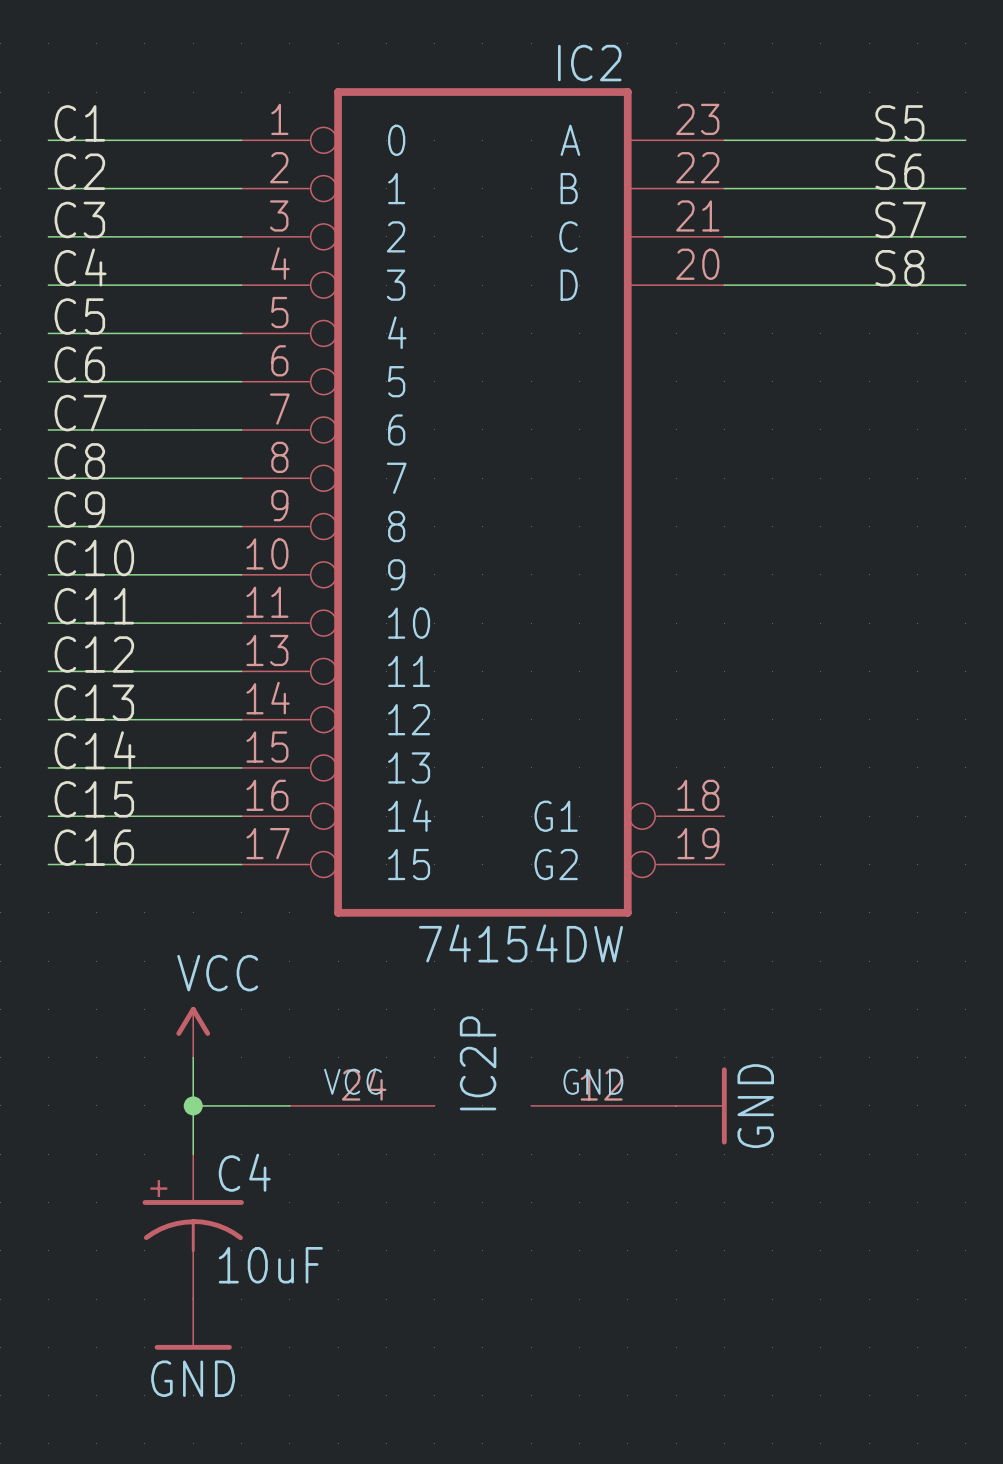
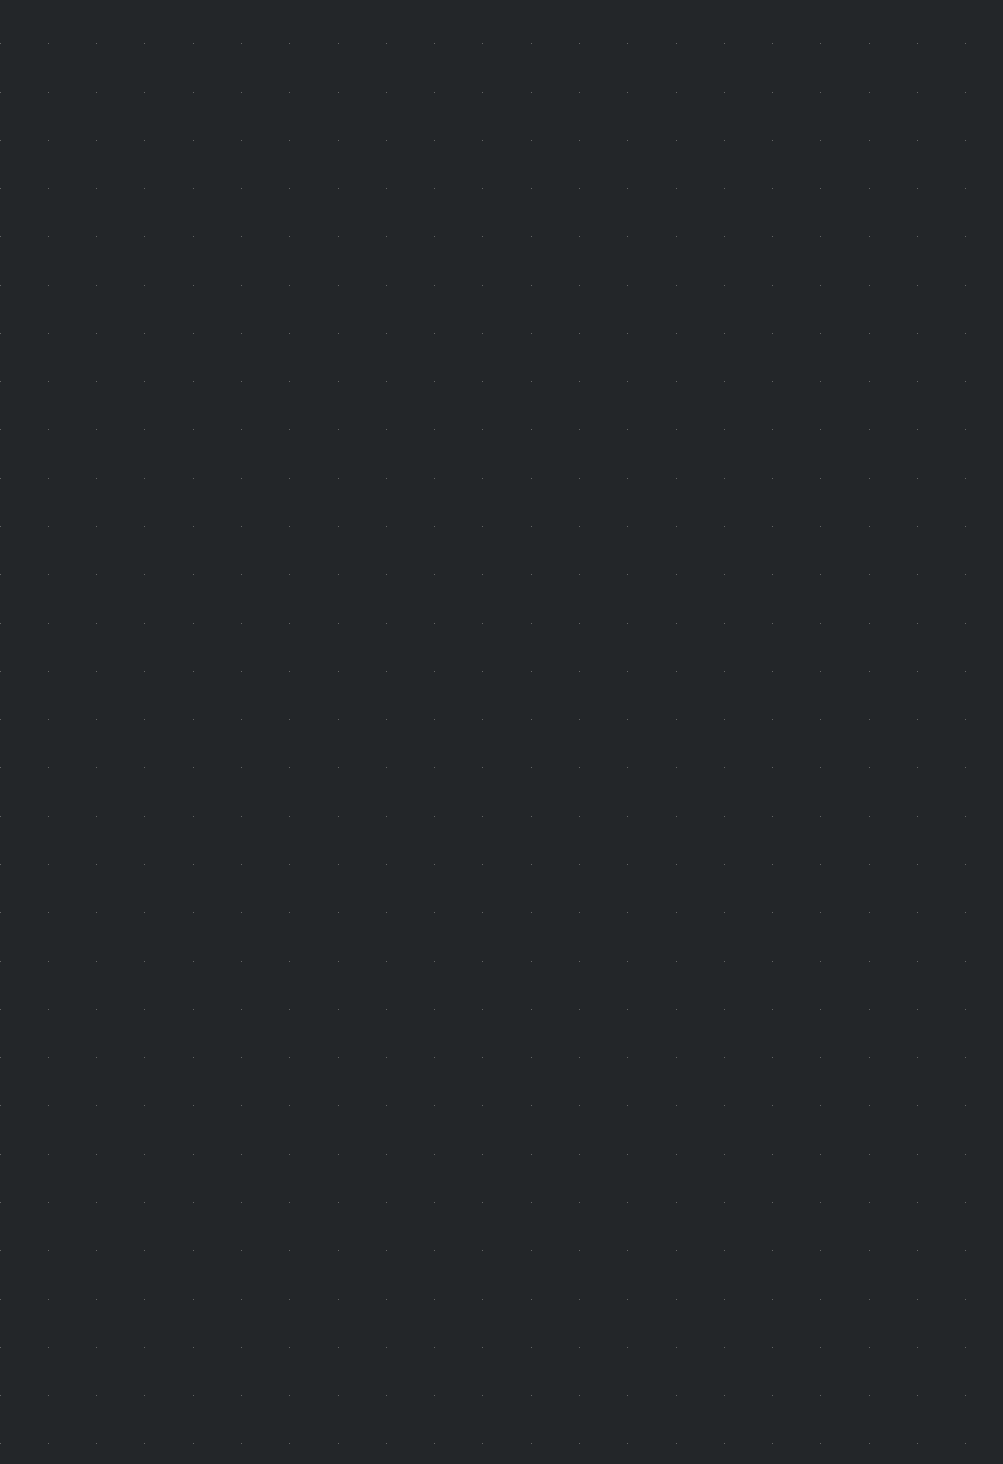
label: C1 (79, 123) -> none
label: S5 (899, 123) -> none
wire: (48, 140) (241, 140) -> none
wire: (724, 140) (965, 140) -> none
label: C2 (79, 171) -> none
label: S6 (899, 171) -> none
wire: (48, 188) (241, 188) -> none
wire: (724, 188) (965, 188) -> none
label: C3 (79, 219) -> none
label: S7 (900, 219) -> none
wire: (48, 236) (241, 236) -> none
wire: (724, 236) (965, 236) -> none
label: C4 (80, 267) -> none
label: S8 (899, 268) -> none
wire: (48, 285) (241, 285) -> none
wire: (724, 285) (965, 285) -> none
label: C5 (79, 316) -> none
wire: (48, 333) (241, 333) -> none
label: C6 (79, 364) -> none
wire: (48, 381) (241, 381) -> none
label: C7 (80, 413) -> none
wire: (48, 429) (241, 429) -> none
label: C8 (79, 461) -> none
wire: (48, 478) (241, 478) -> none
IC2: 74154DW (482, 502) -> none
label: C9 (79, 509) -> none
wire: (48, 526) (241, 526) -> none
label: C10 (94, 557) -> none
wire: (48, 574) (241, 574) -> none
label: C11 (94, 606) -> none
wire: (48, 623) (241, 623) -> none
label: C12 (94, 654) -> none
wire: (48, 671) (241, 671) -> none
label: C13 (94, 702) -> none
wire: (48, 719) (241, 719) -> none
label: C14 (95, 750) -> none
wire: (48, 767) (241, 767) -> none
label: C15 (94, 799) -> none
wire: (48, 816) (241, 816) -> none
label: C16 (94, 847) -> none
wire: (48, 864) (241, 864) -> none
power symbol: VCC (193, 1032) -> none
wire: (193, 1057) (193, 1154) -> none
wire: (193, 1105) (289, 1105) -> none
junction: (193, 1105) -> none
IC2P: (482, 1105) -> none
power symbol: GND (701, 1105) -> none
C4: 10uF (193, 1226) -> none
power symbol: GND (193, 1324) -> none

